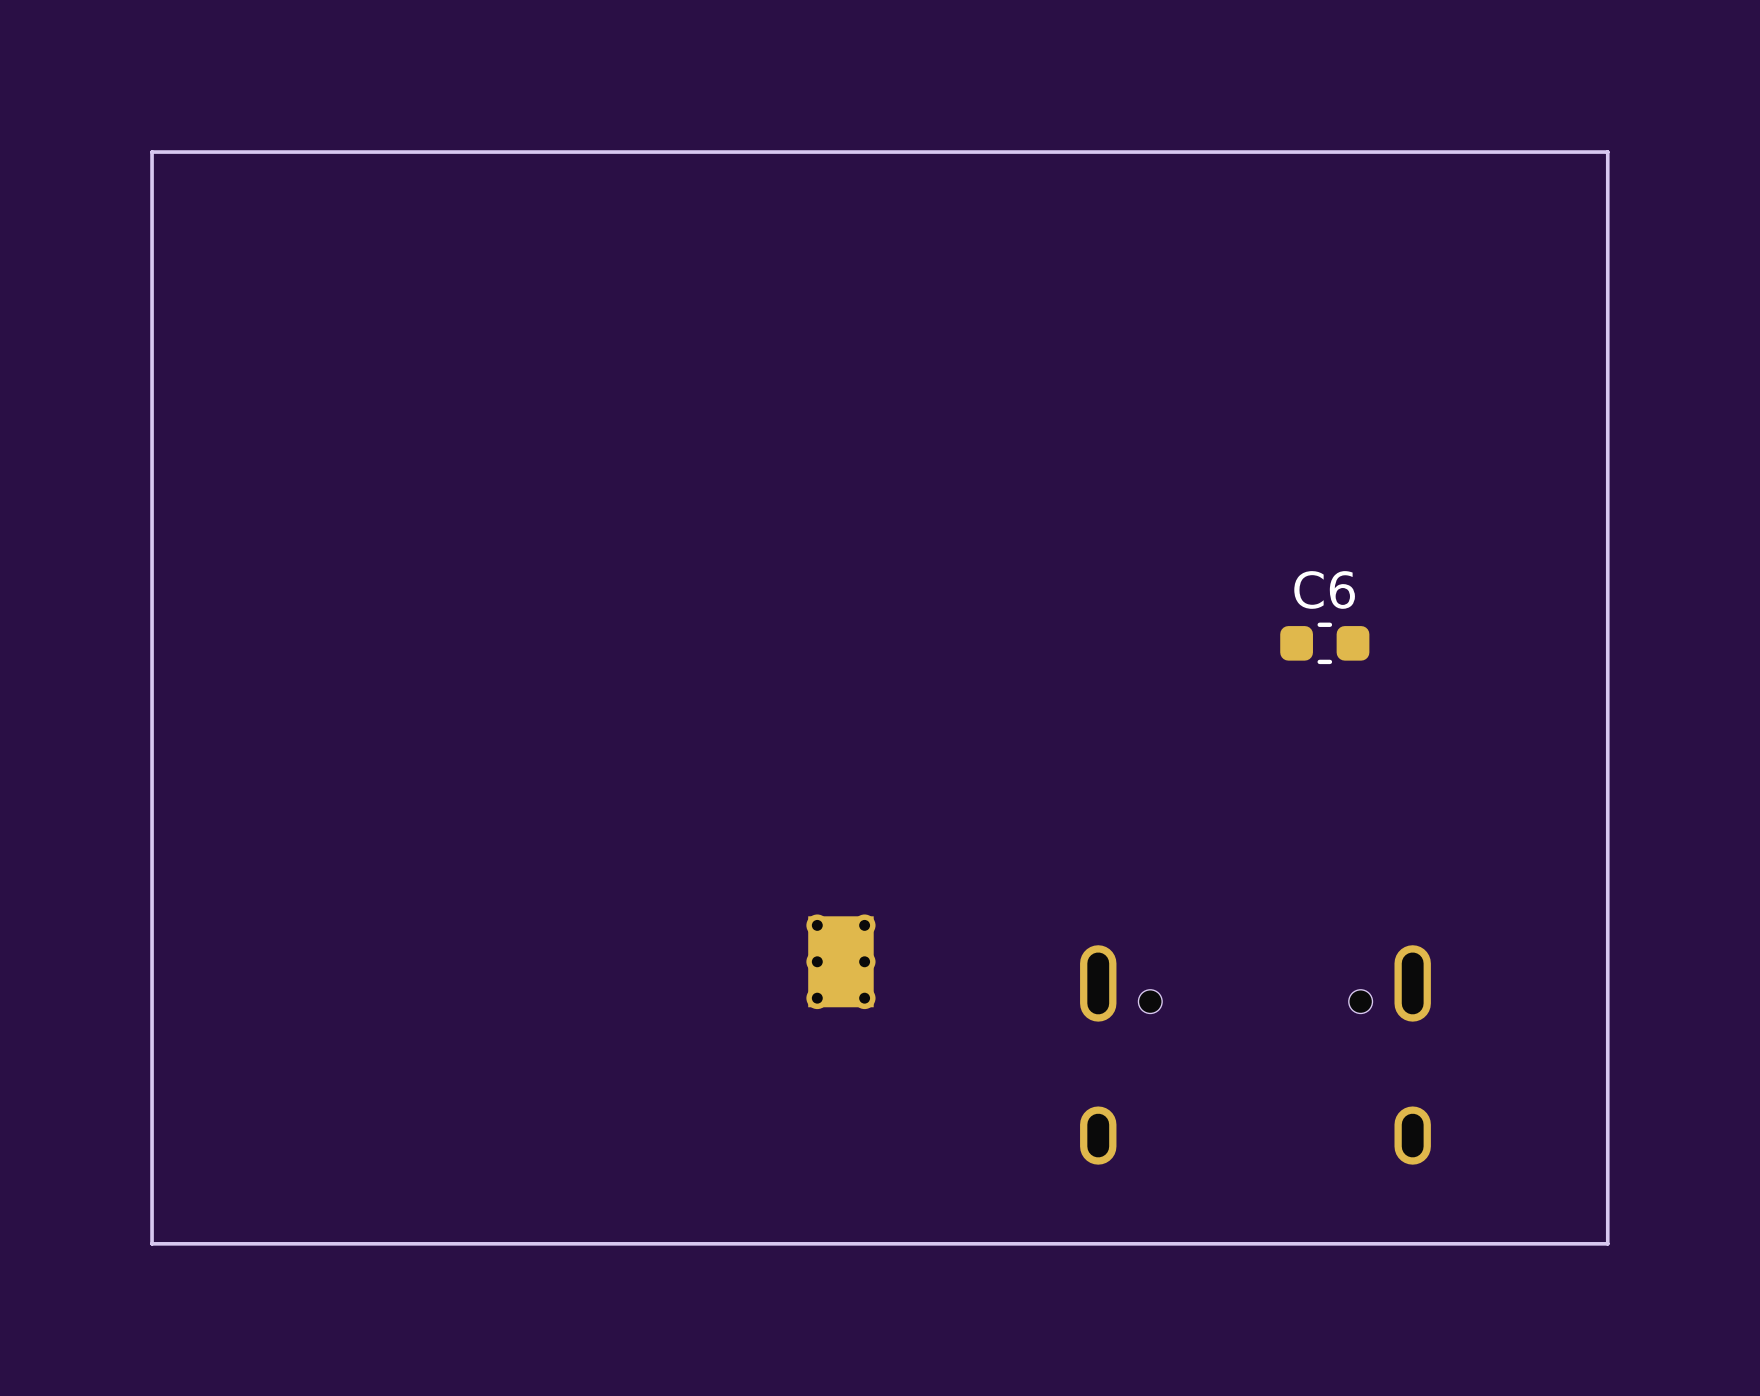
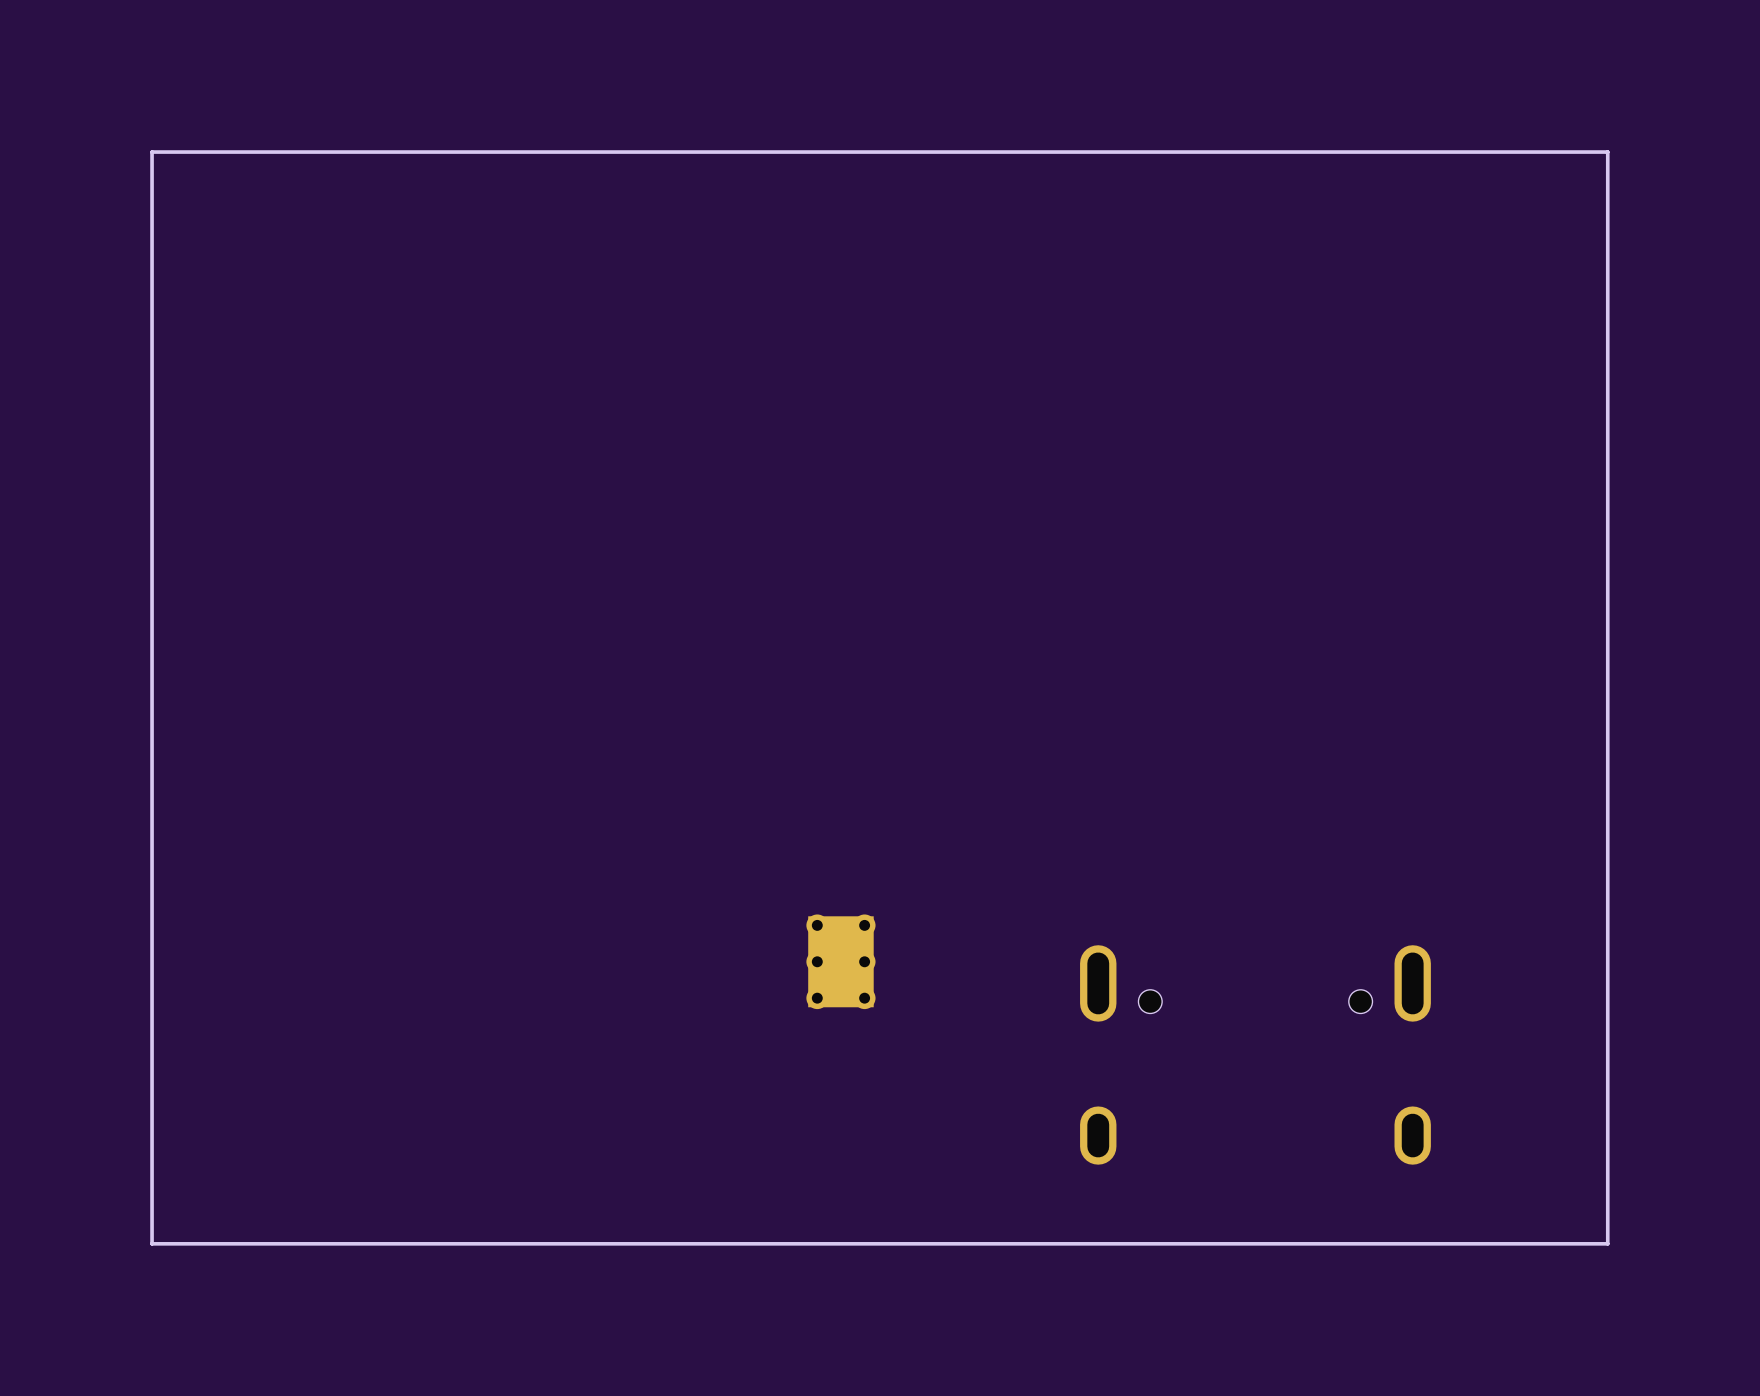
C6: (1324, 643) -> none

